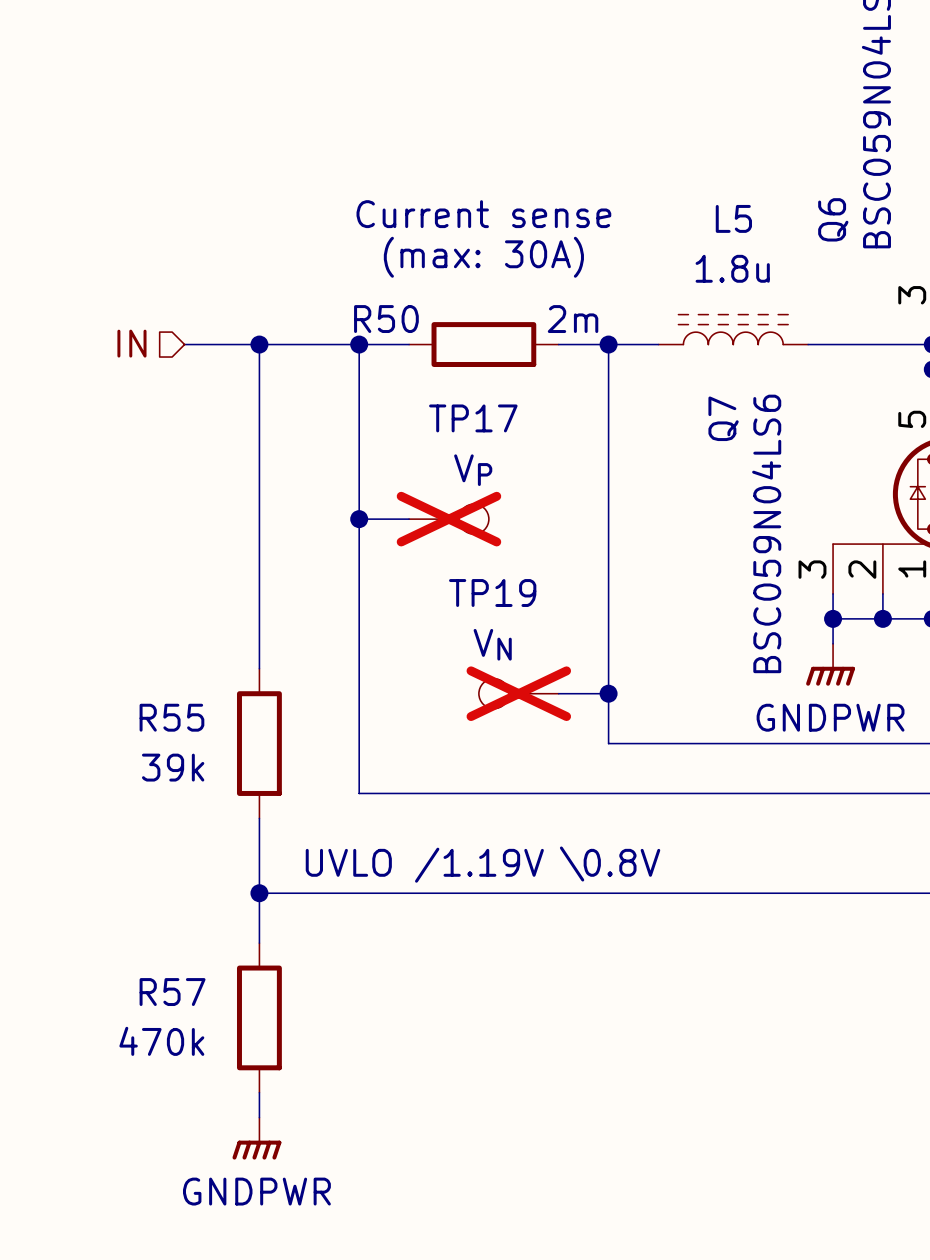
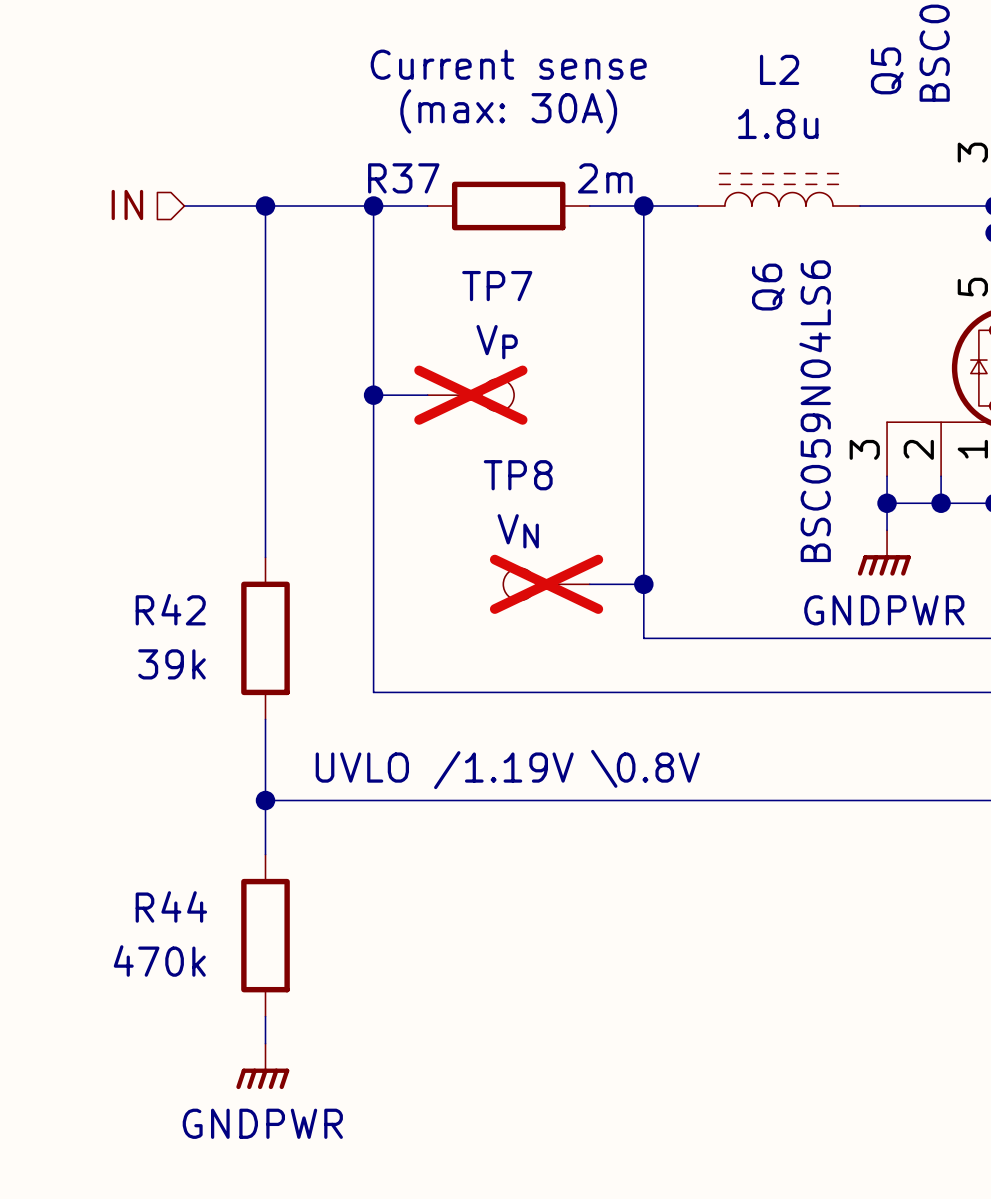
L5 name: L5 (733, 218) -> L2 (779, 69)
Q6 name: Q6 (833, 219) -> Q5 (887, 70)
R50 name: R50 (386, 319) -> R37 (403, 178)
TP17 name: TP17 (473, 418) -> TP7 (497, 286)
Q7 name: Q7 (723, 418) -> Q6 (768, 287)
TP19 name: TP19 (492, 593) -> TP8 (518, 475)
R55 name: R55 (171, 717) -> R42 (170, 609)
R57 name: R57 (172, 992) -> R44 (171, 906)

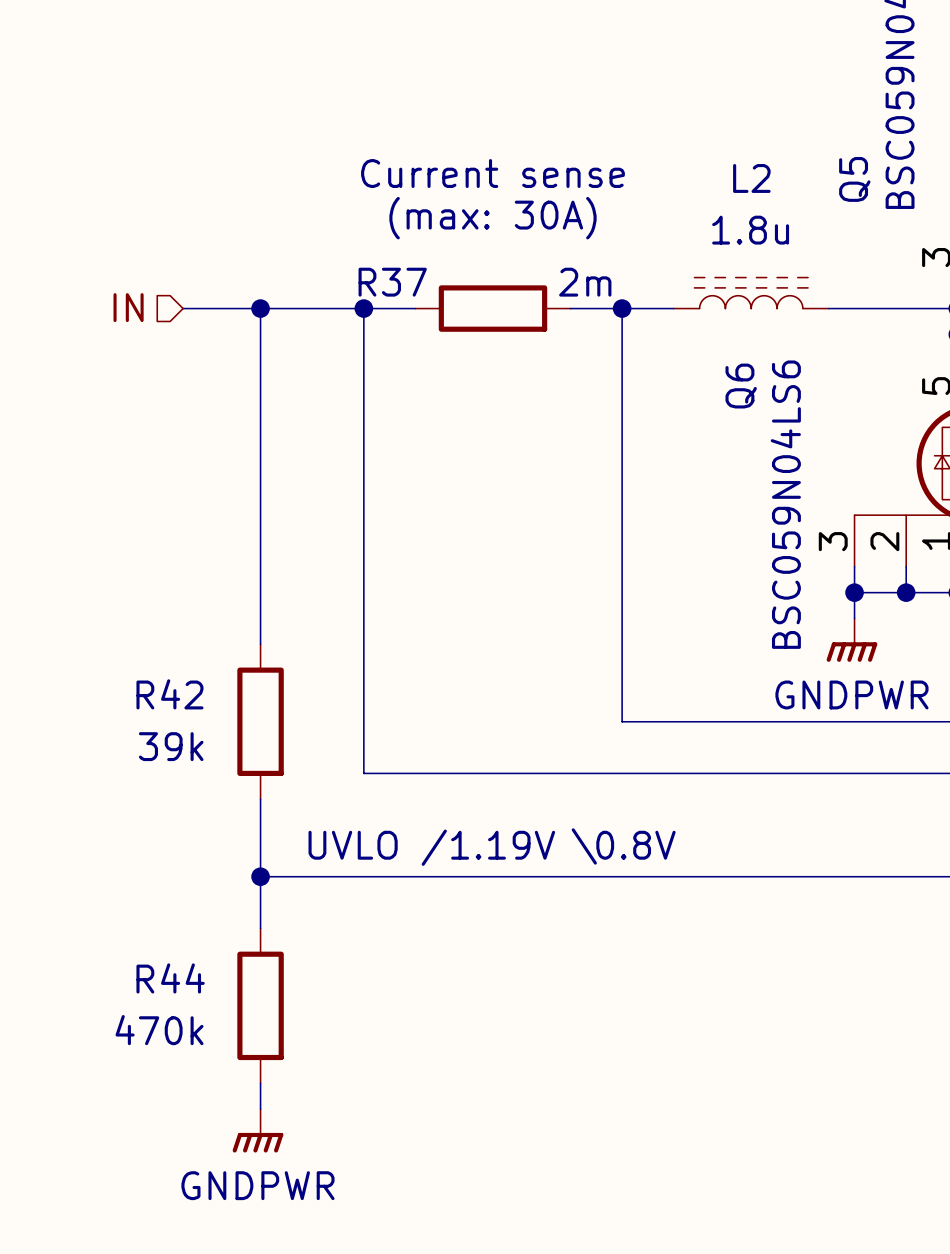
wire: (373, 395) (427, 395) -> none
junction: (373, 395) -> none
TP7: VP (470, 395) -> none
TP8: VN (546, 584) -> none
wire: (589, 584) (643, 584) -> none
junction: (643, 584) -> none

